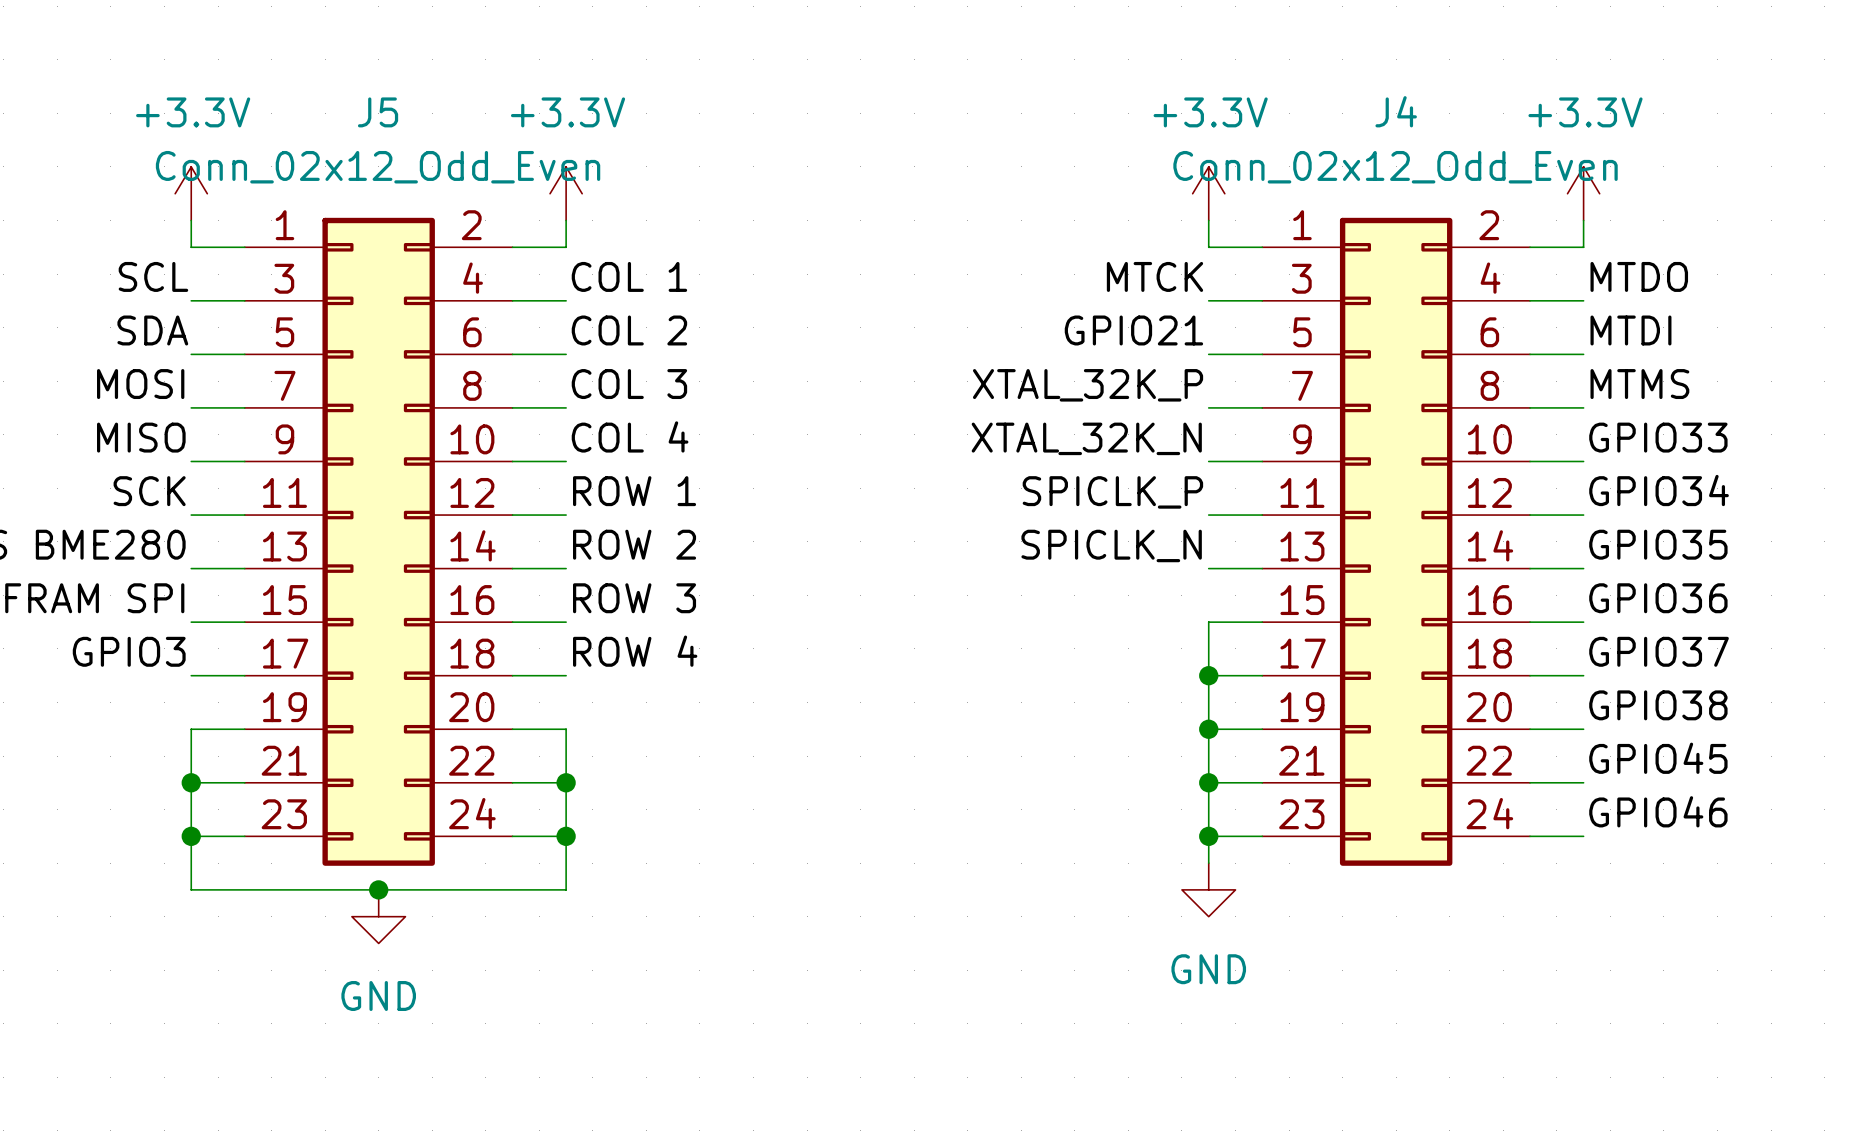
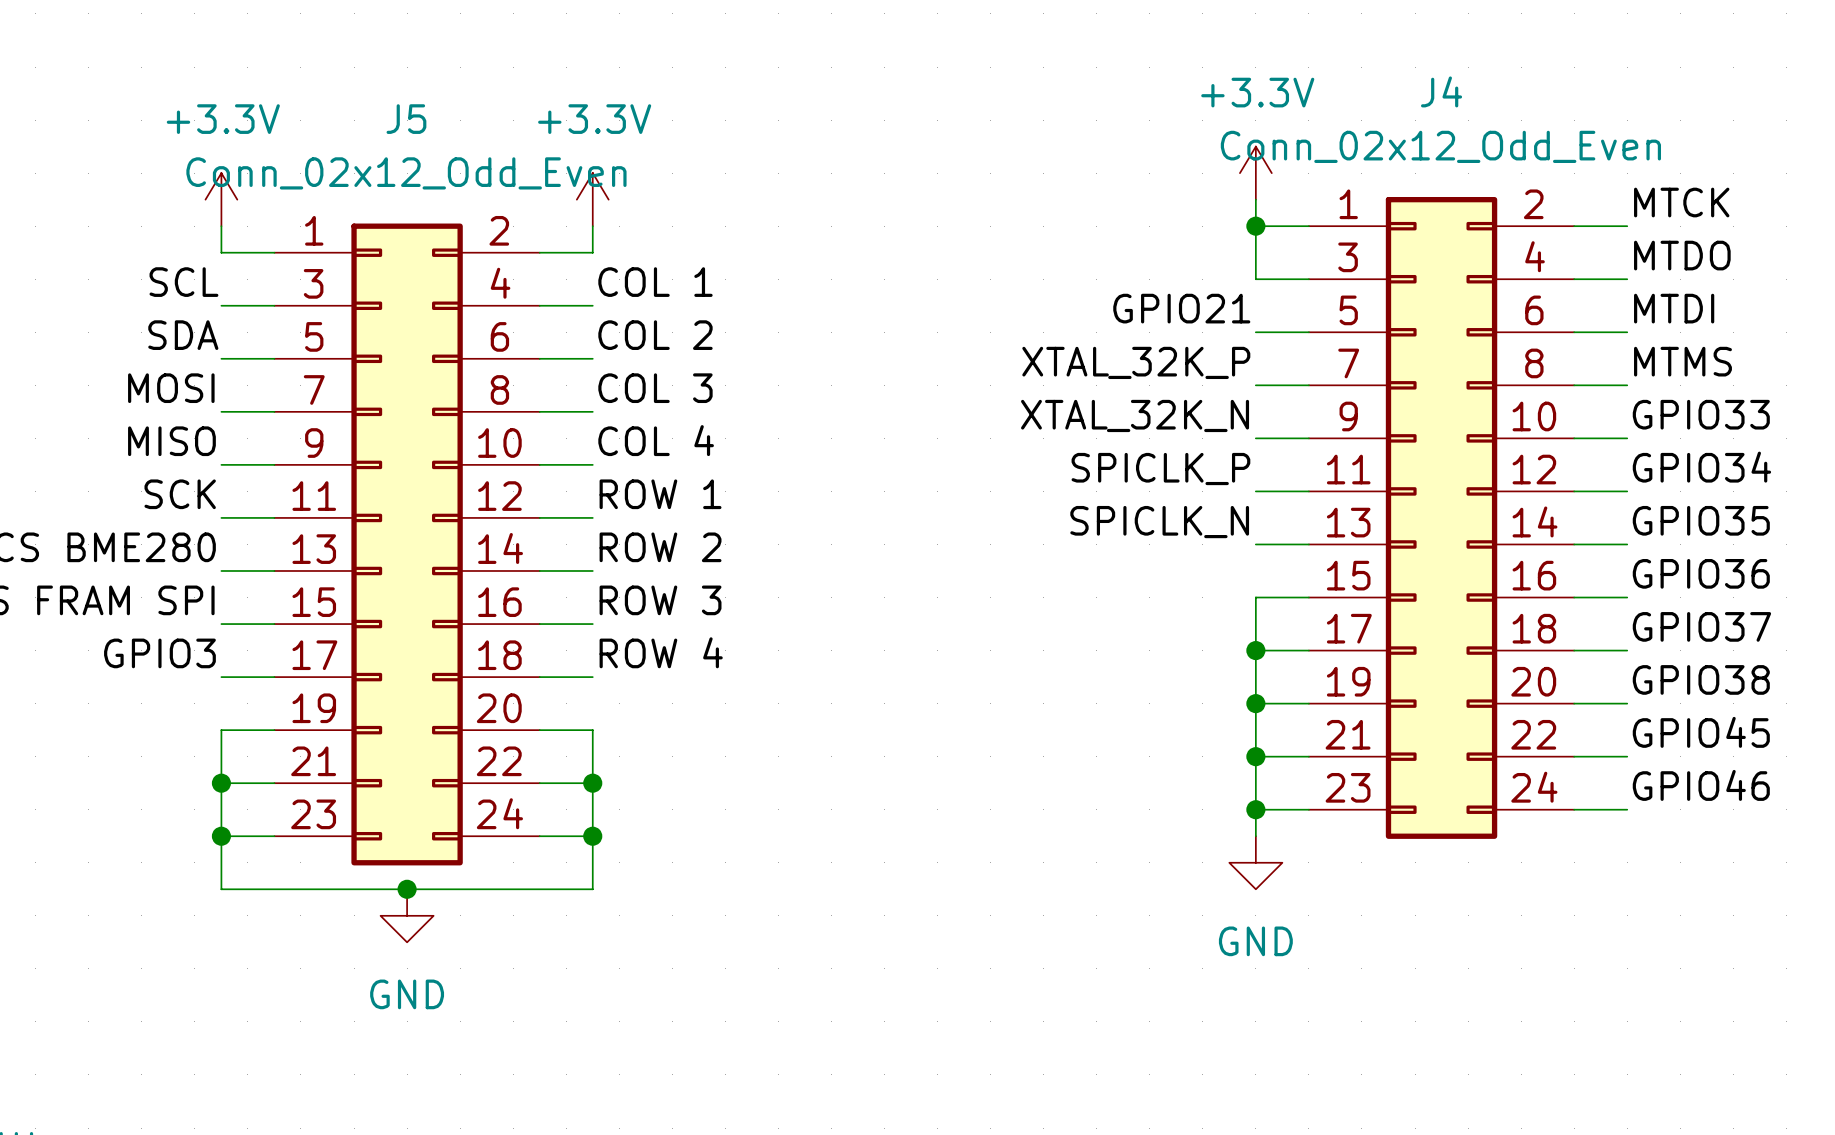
power symbol position: +3.3V (1208, 193) -> +3.3V (1255, 173)
wire: none -> (1255, 199) (1255, 279) (1308, 279)
power symbol: +3.3V (1583, 193) -> none
wire: (1208, 220) (1208, 247) (1262, 247) -> none
junction: none -> (1255, 226)
wire: none -> (1574, 226) (1627, 226)
wire: (1583, 220) (1583, 247) (1530, 247) -> none
label position: MTCK (1154, 276) -> MTCK (1681, 202)
label position: MTDO (1639, 276) -> MTDO (1682, 255)
wire: (1208, 300) (1262, 300) -> (1255, 226) (1308, 226)
wire: (1530, 300) (1583, 300) -> (1574, 279) (1627, 279)
label position: GPIO21 (1133, 330) -> GPIO21 (1181, 308)
label position: MTDI (1630, 330) -> MTDI (1674, 308)
wire: (1208, 354) (1262, 354) -> (1255, 332) (1308, 332)
wire: (1530, 354) (1583, 354) -> (1574, 332) (1627, 332)
label position: MTMS (1639, 384) -> MTMS (1682, 361)
label position: XTAL_32K_P (1088, 385) -> XTAL_32K_P (1136, 362)
wire: (1208, 407) (1262, 407) -> (1255, 385) (1308, 385)
wire: (1530, 407) (1583, 407) -> (1574, 385) (1627, 385)
label position: GPIO33 (1658, 437) -> GPIO33 (1701, 414)
label position: XTAL_32K_N (1086, 438) -> XTAL_32K_N (1135, 415)
wire: (1208, 461) (1262, 461) -> (1255, 438) (1308, 438)
wire: (1530, 461) (1583, 461) -> (1574, 438) (1627, 438)
label position: GPIO34 (1659, 490) -> GPIO34 (1701, 467)
label position: SPICLK_P (1112, 492) -> SPICLK_P (1160, 469)
wire: (1208, 515) (1262, 515) -> (1255, 491) (1308, 491)
wire: (1530, 515) (1583, 515) -> (1574, 491) (1627, 491)
J4 position: (1396, 541) -> (1441, 517)
label position: GPIO35 (1658, 544) -> GPIO35 (1701, 520)
label position: SPICLK_N (1111, 545) -> SPICLK_N (1159, 522)
wire: (1208, 568) (1262, 568) -> (1255, 544) (1308, 544)
wire: (1530, 568) (1583, 568) -> (1574, 544) (1627, 544)
label position: GPIO36 (1658, 598) -> GPIO36 (1701, 573)
wire: (1262, 622) (1208, 622) (1208, 863) -> (1308, 597) (1255, 597) (1255, 836)
wire: (1530, 622) (1583, 622) -> (1574, 597) (1627, 597)
junction: none -> (1255, 650)
label position: GPIO37 (1659, 651) -> GPIO37 (1701, 626)
wire: (1208, 675) (1262, 675) -> (1255, 650) (1308, 650)
junction: (1208, 675) -> none
wire: (1530, 675) (1583, 675) -> (1574, 650) (1627, 650)
junction: none -> (1255, 703)
label position: GPIO38 (1658, 705) -> GPIO38 (1701, 679)
wire: (1208, 729) (1262, 729) -> (1255, 703) (1308, 703)
junction: (1208, 729) -> none
wire: (1530, 729) (1583, 729) -> (1574, 703) (1627, 703)
junction: none -> (1255, 756)
label position: GPIO45 (1658, 758) -> GPIO45 (1701, 732)
wire: (1208, 782) (1262, 782) -> (1255, 756) (1308, 756)
junction: (1208, 782) -> none
wire: (1530, 782) (1583, 782) -> (1574, 756) (1627, 756)
junction: none -> (1255, 809)
label position: GPIO46 (1658, 811) -> GPIO46 (1701, 785)
wire: (1208, 836) (1262, 836) -> (1255, 809) (1308, 809)
junction: (1208, 836) -> none
wire: (1530, 836) (1583, 836) -> (1574, 809) (1627, 809)
power symbol position: GND (1208, 889) -> GND (1255, 862)

